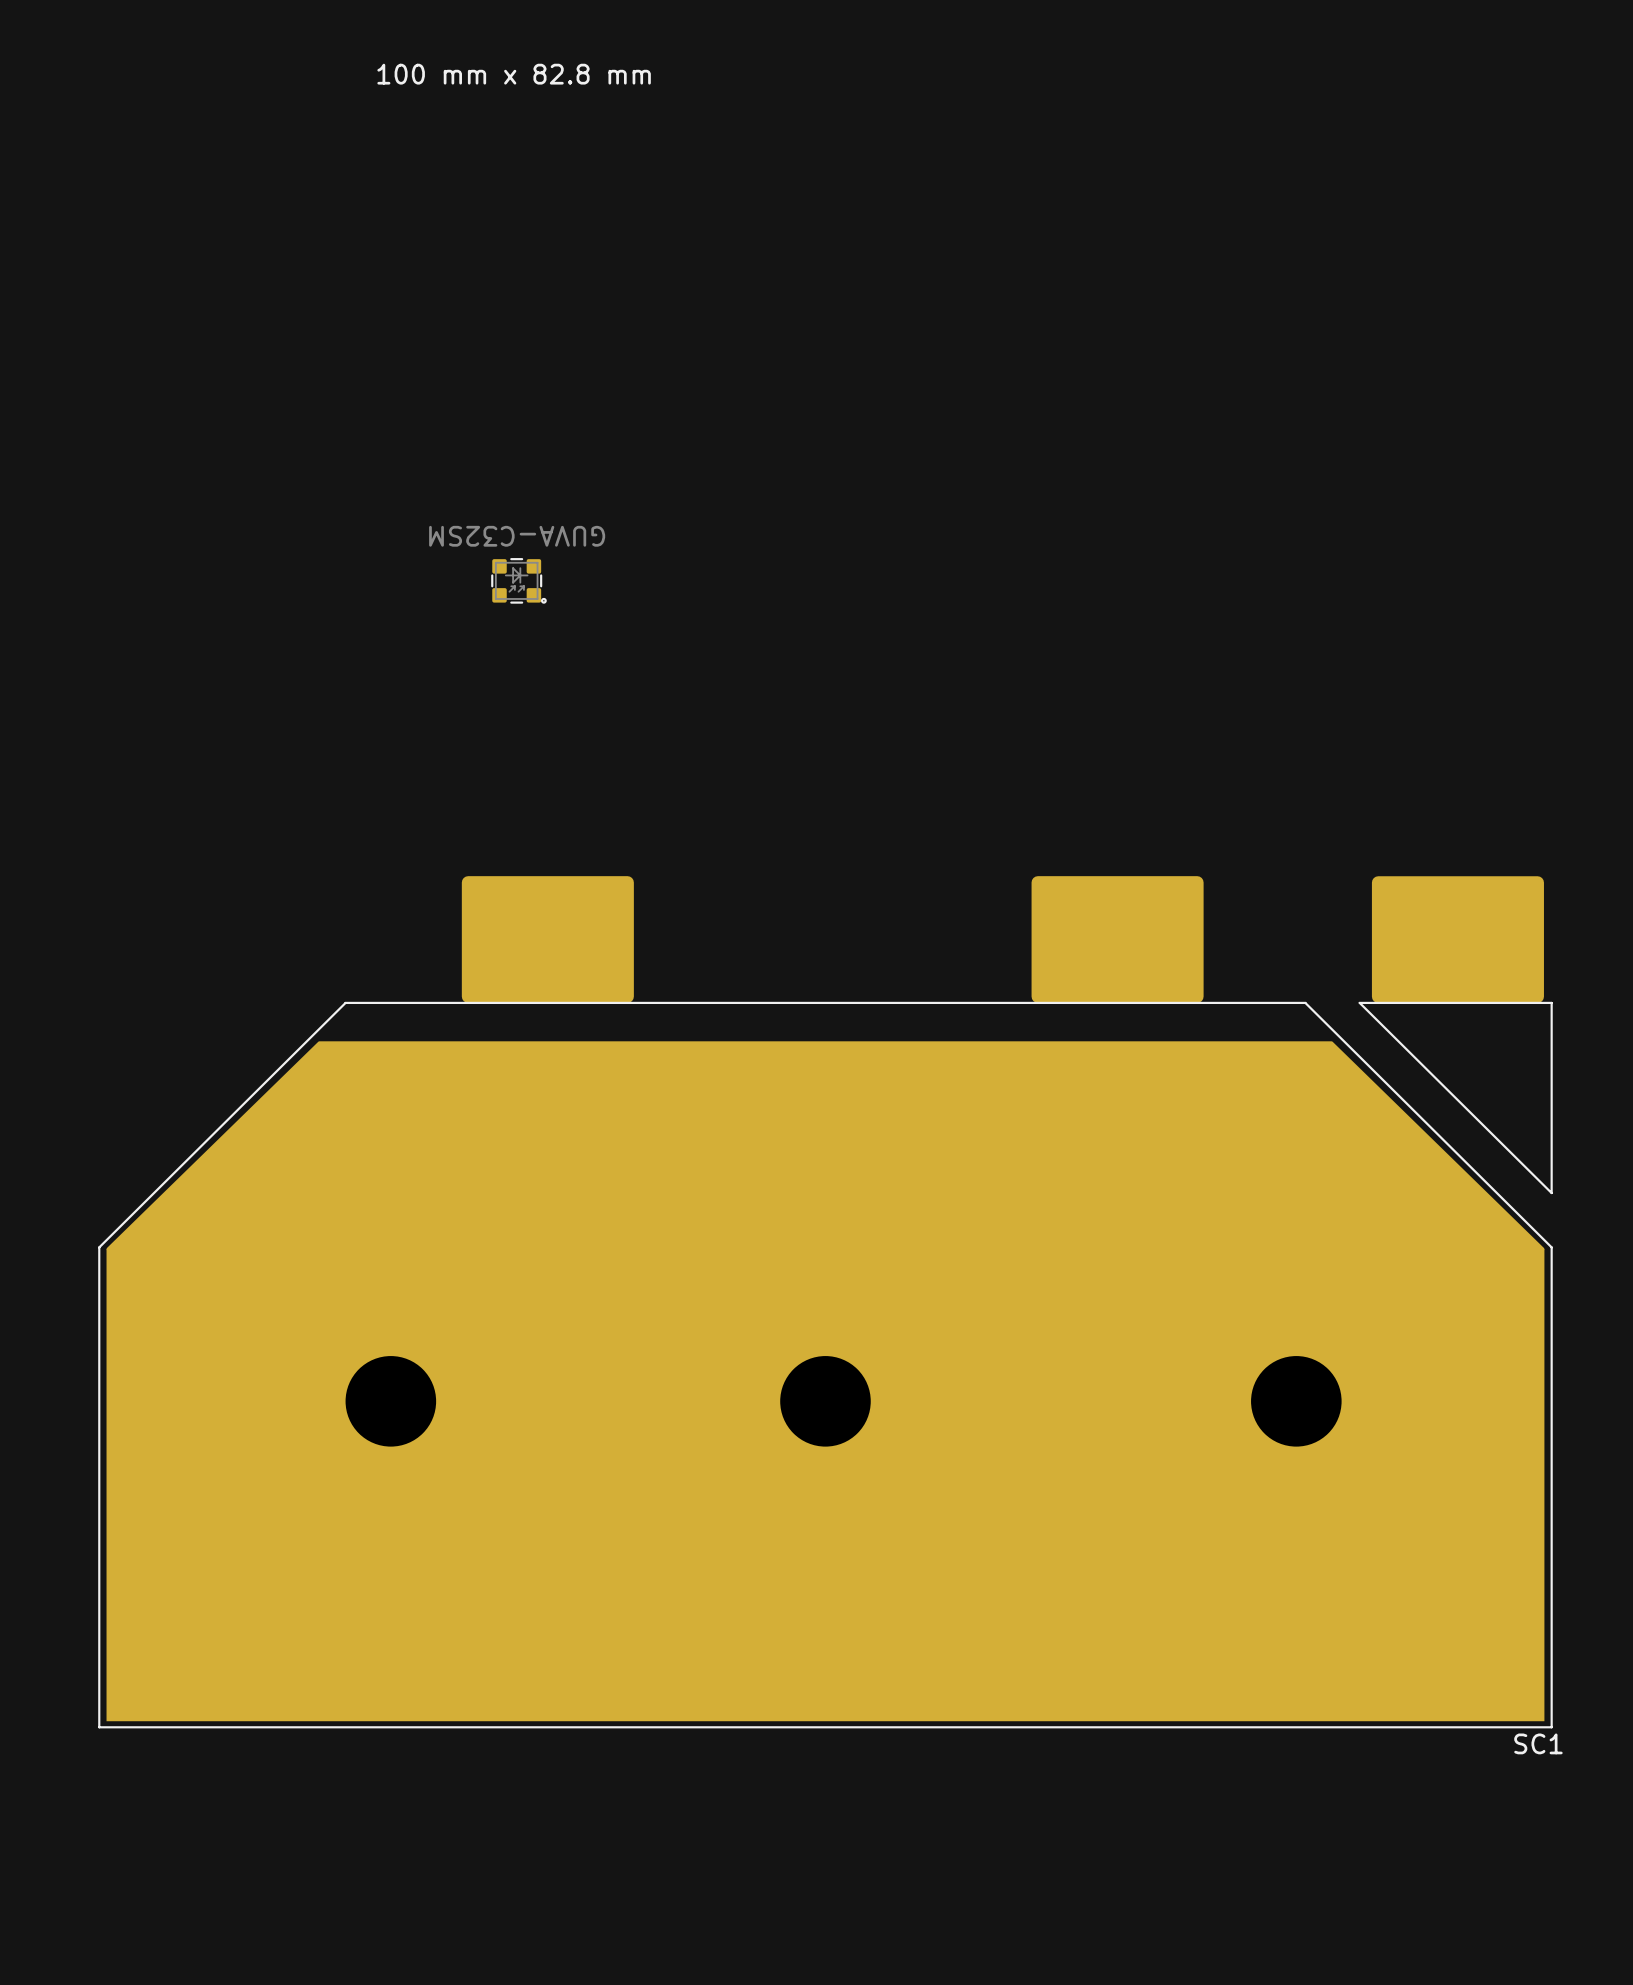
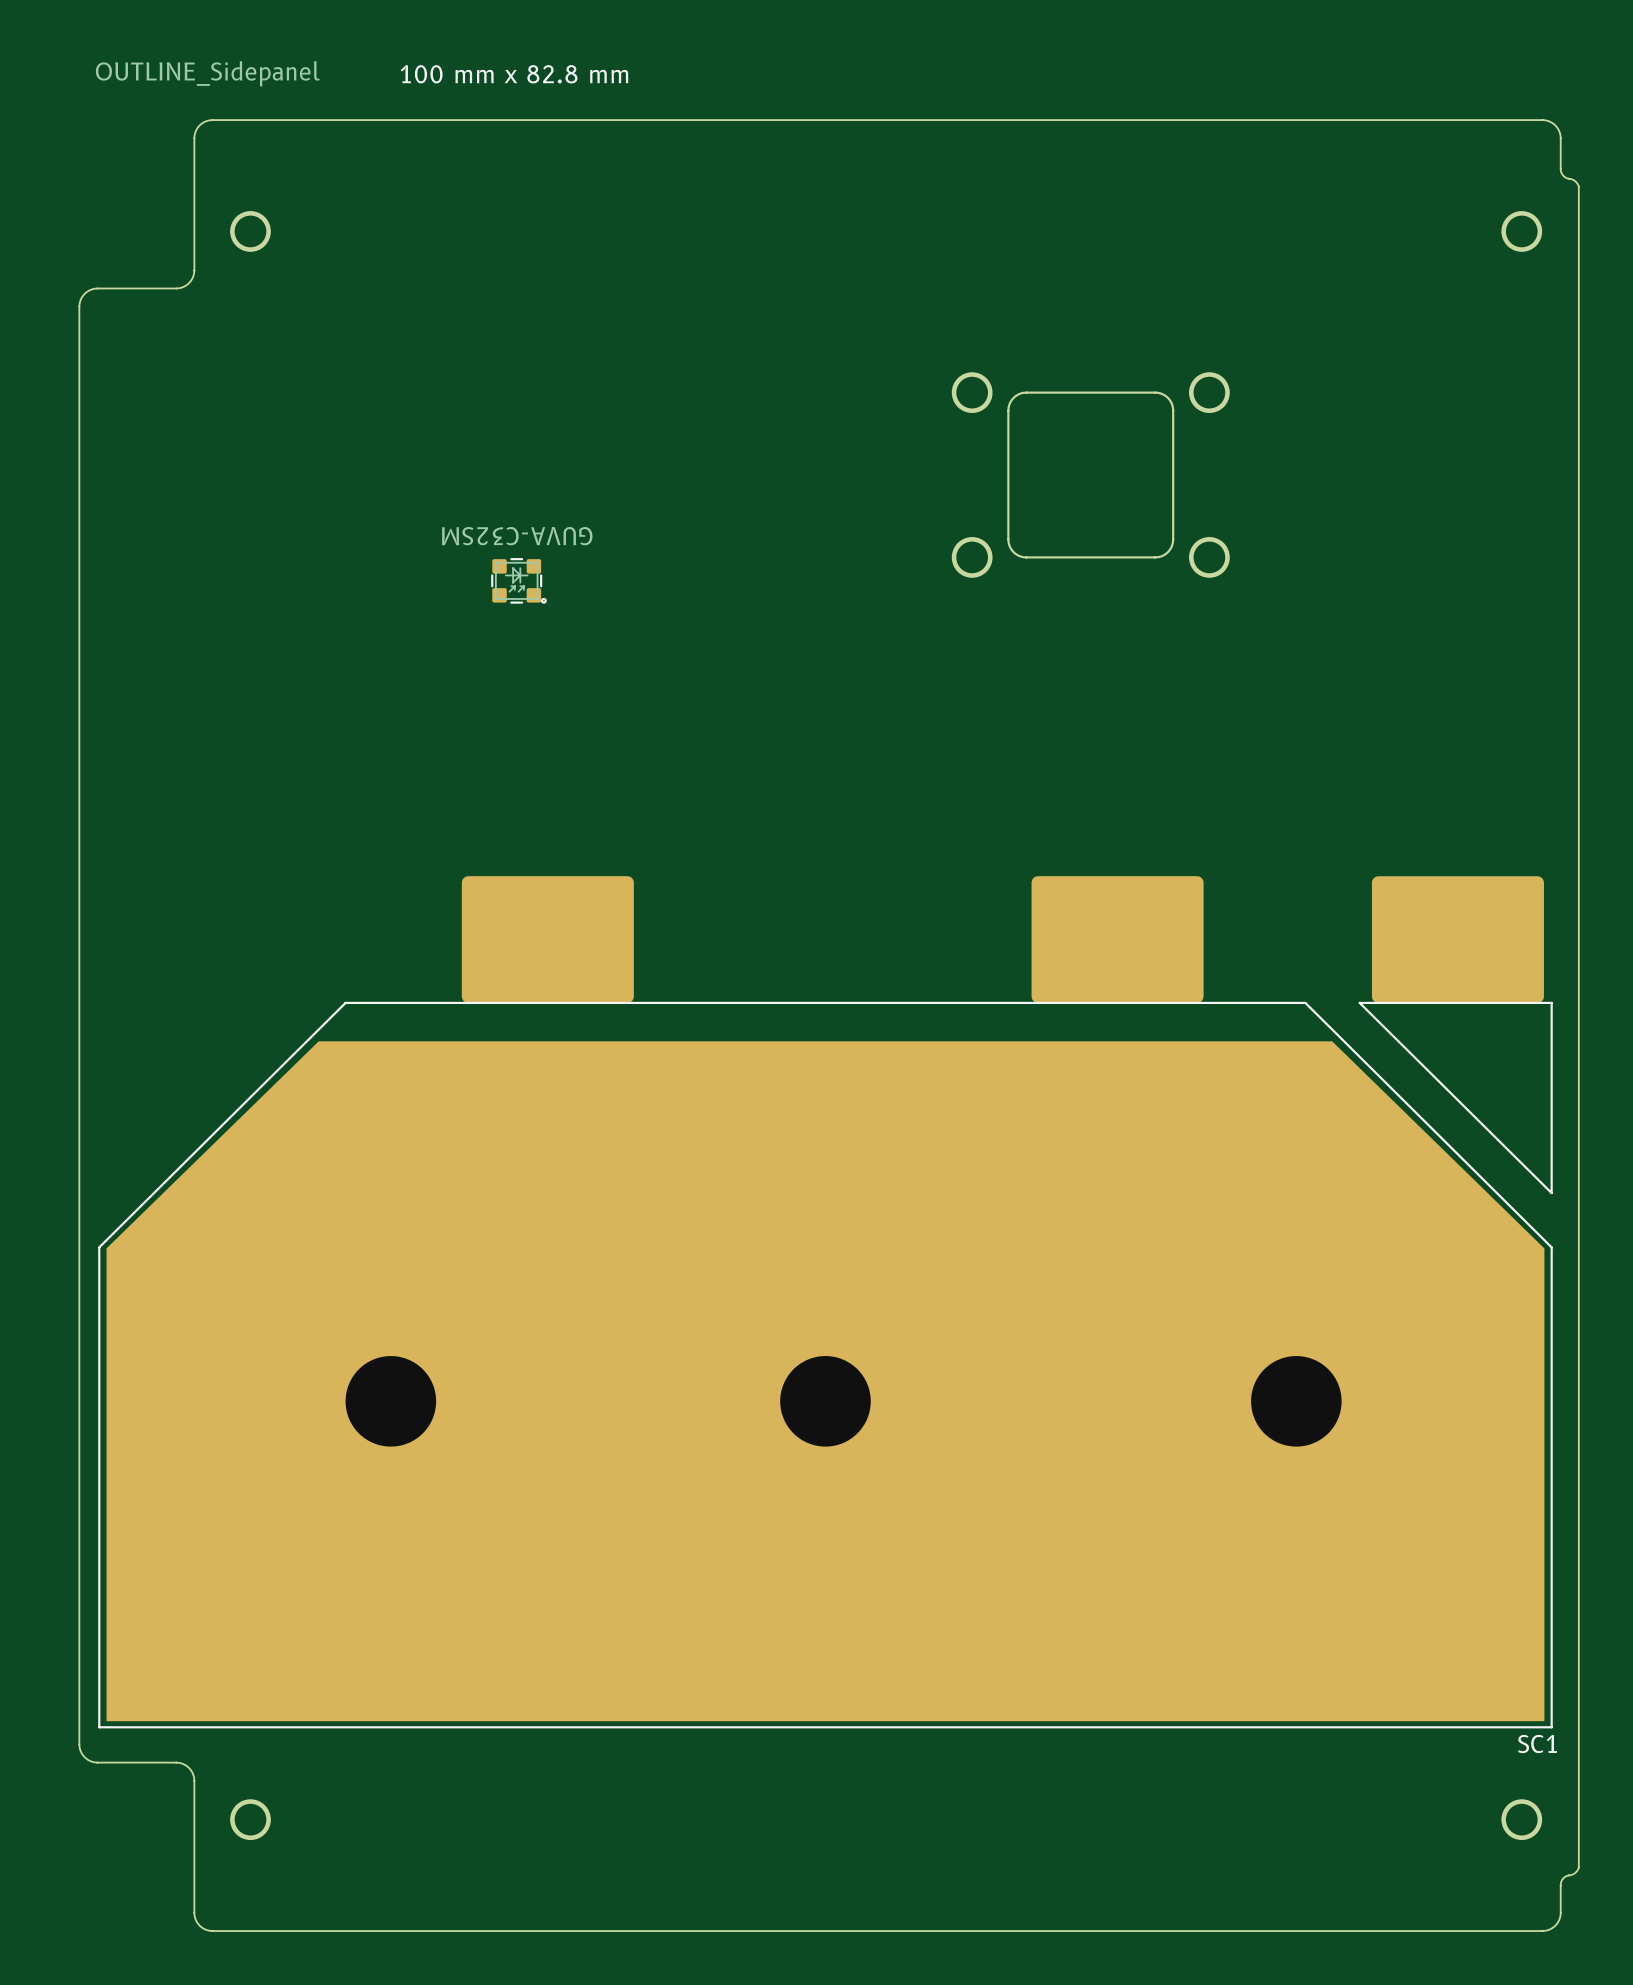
drawing: none -> [78, 119, 1580, 1932]

